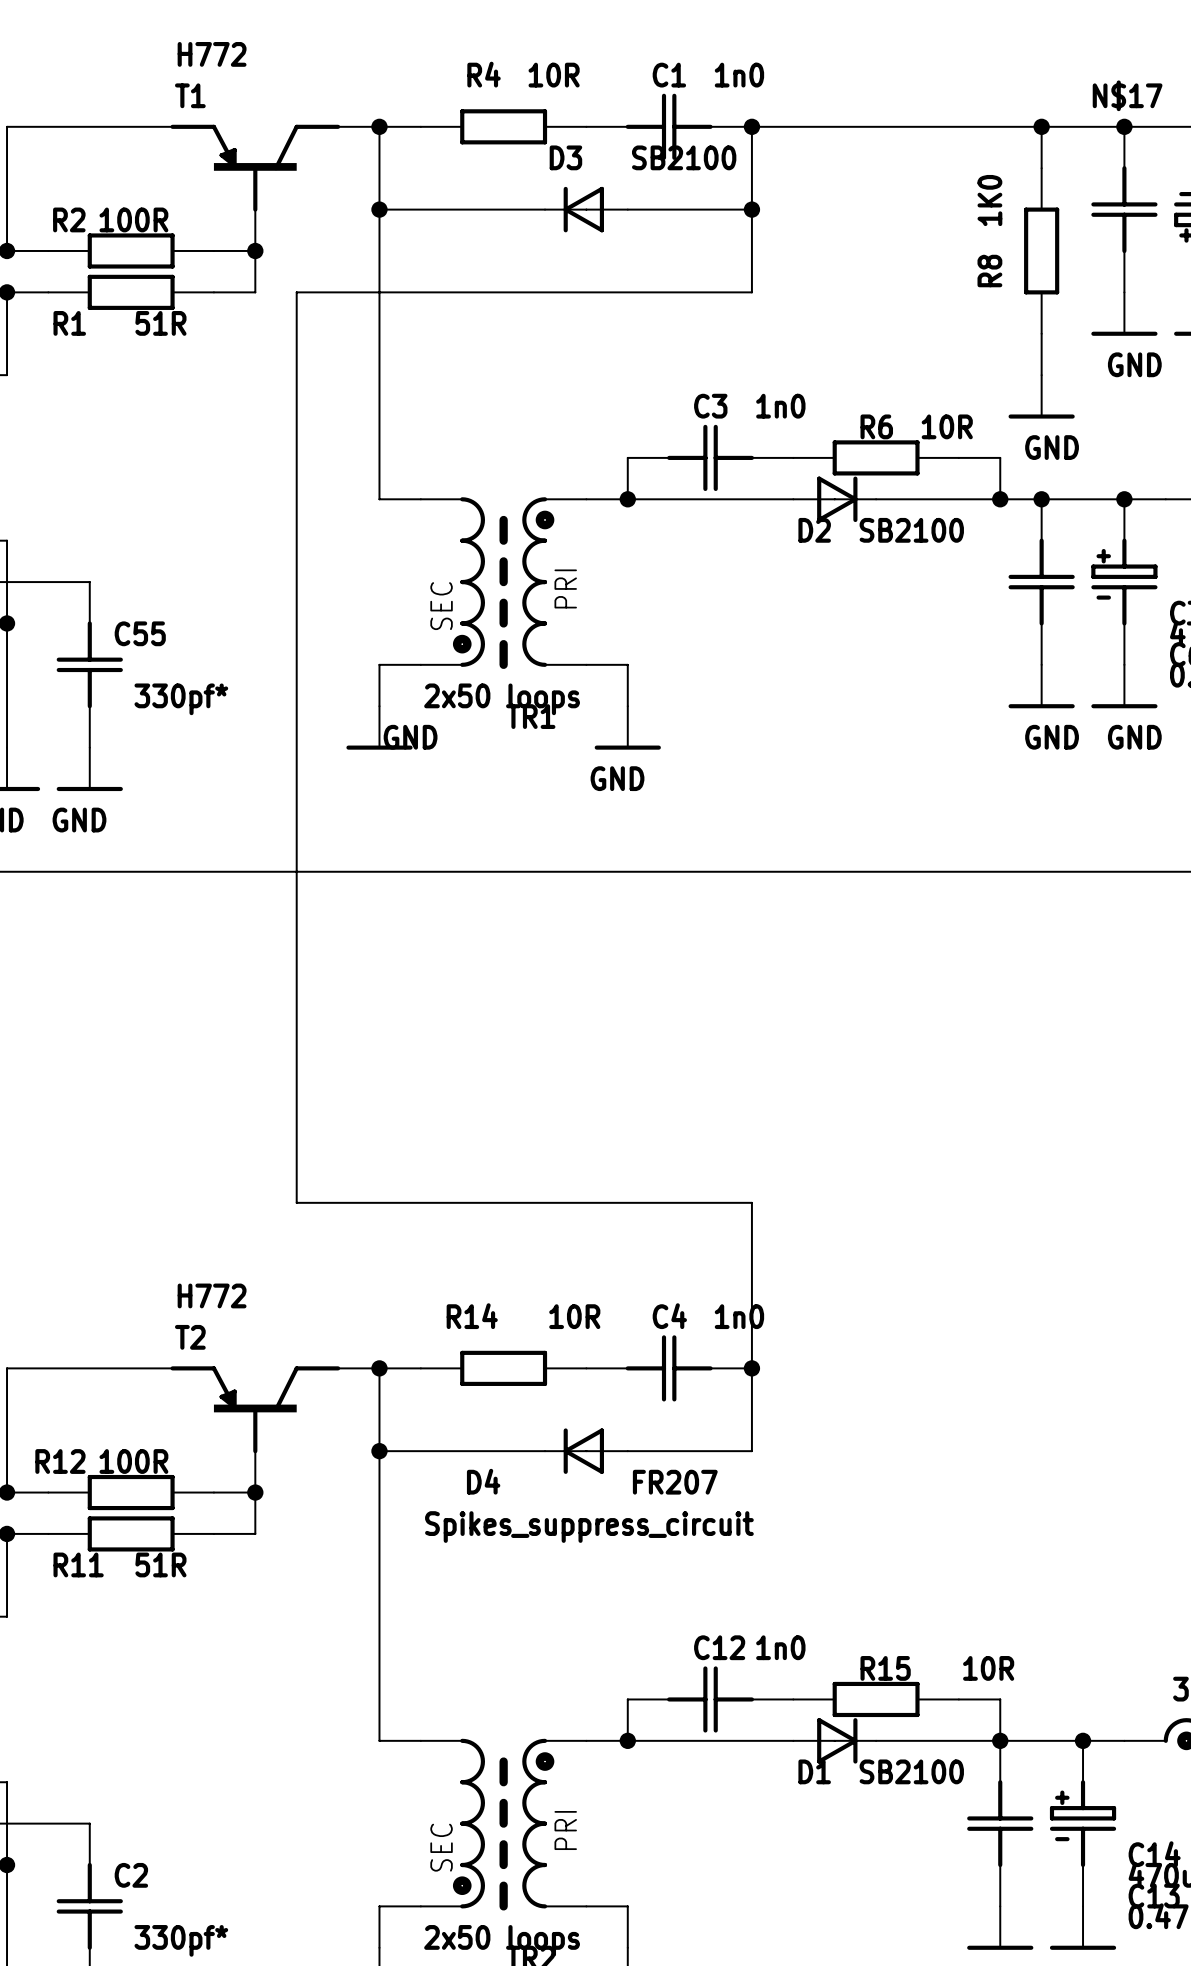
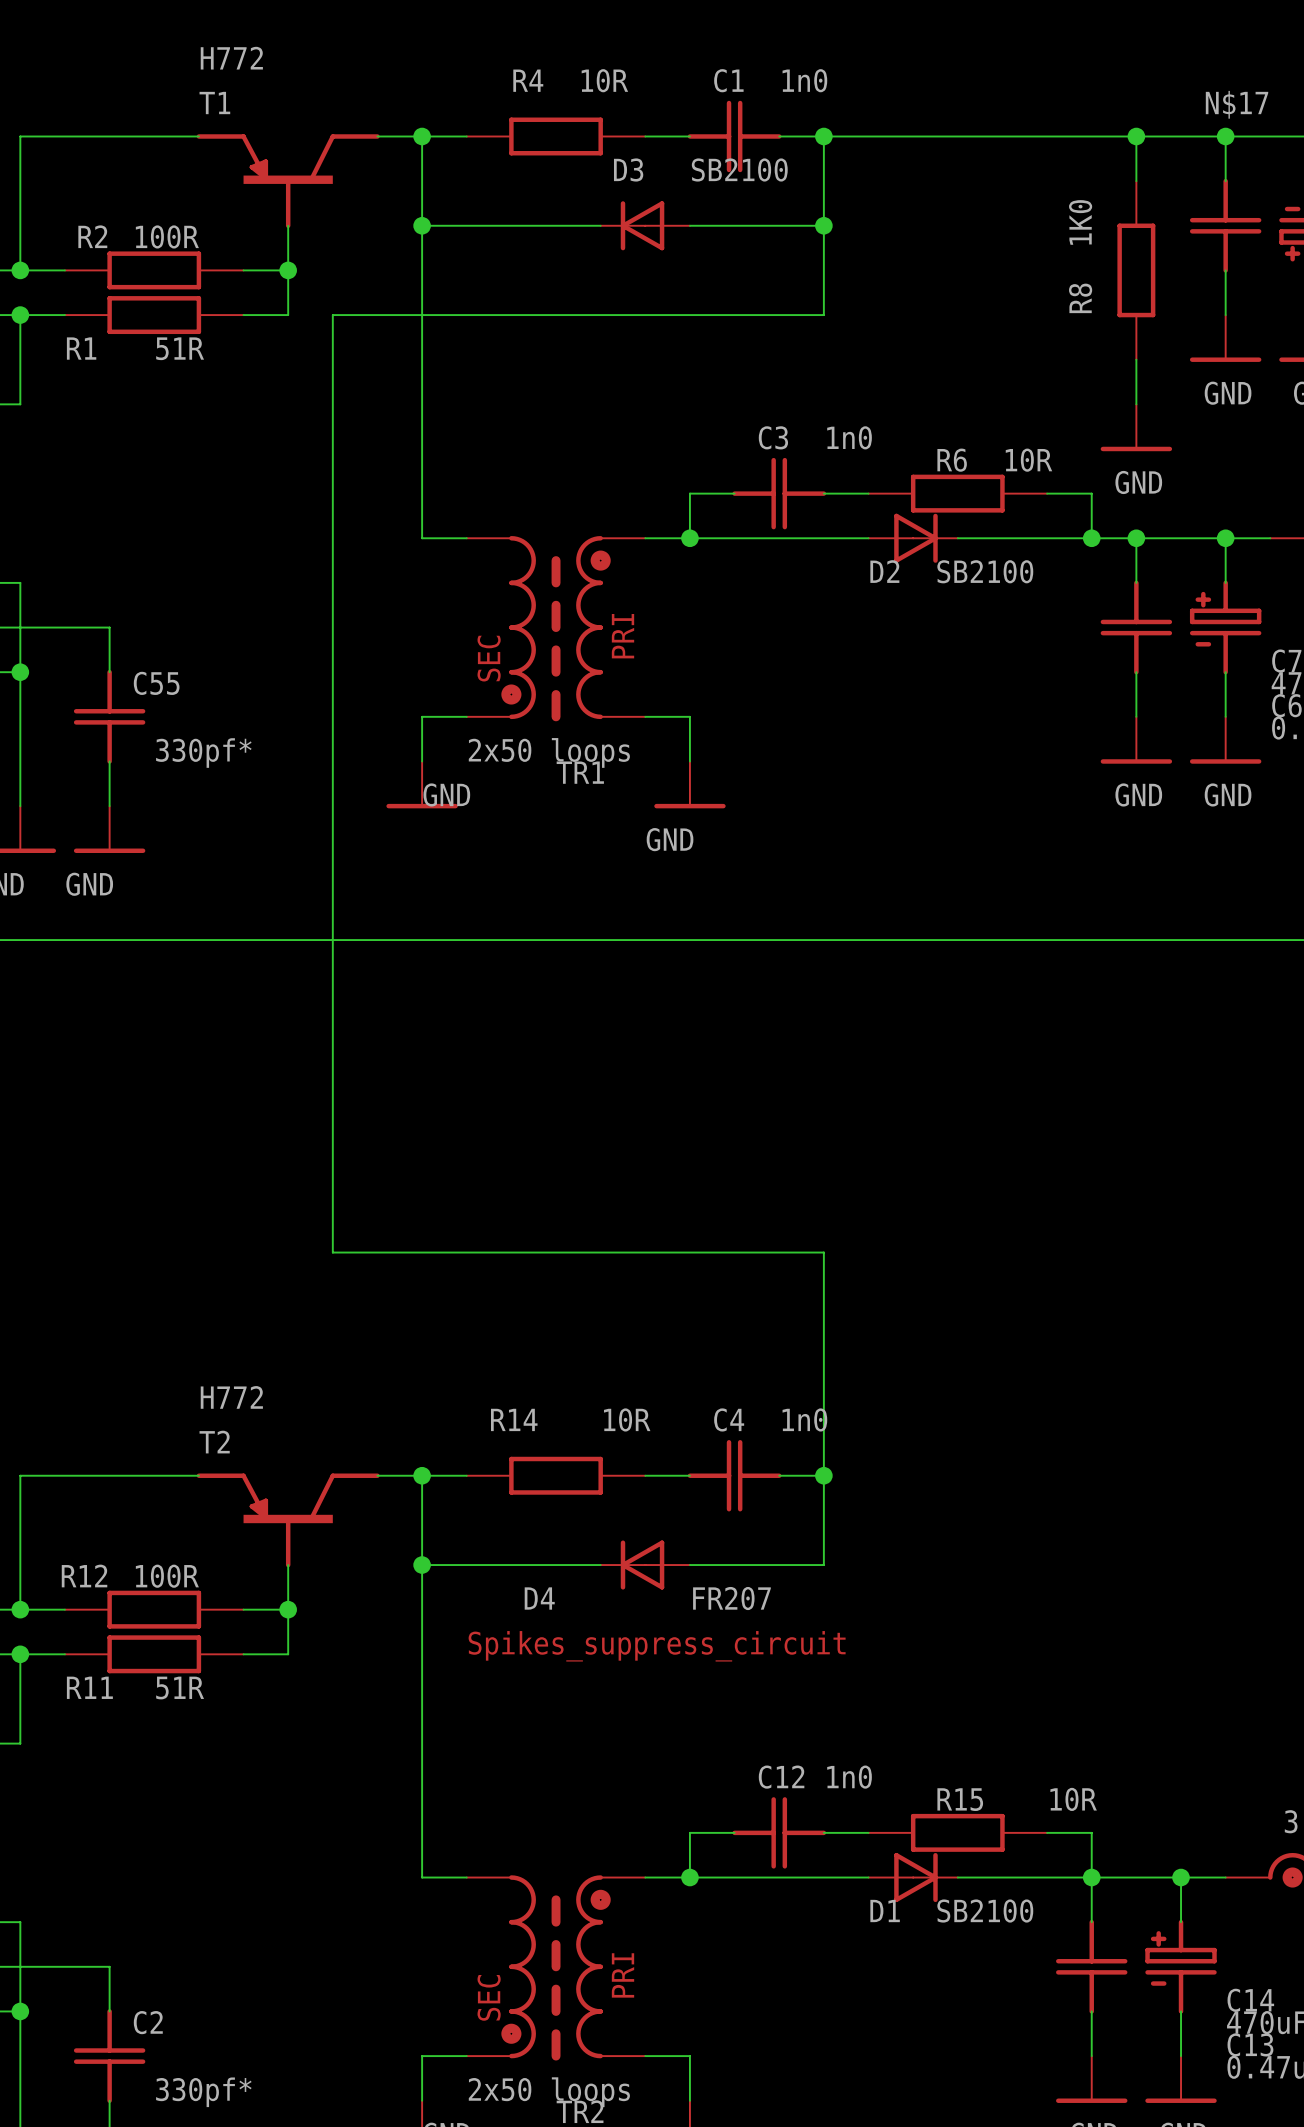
wire: (296, 1161) (296, 1202) (751, 1202) -> (332, 1252) (823, 1252) (823, 1297)

